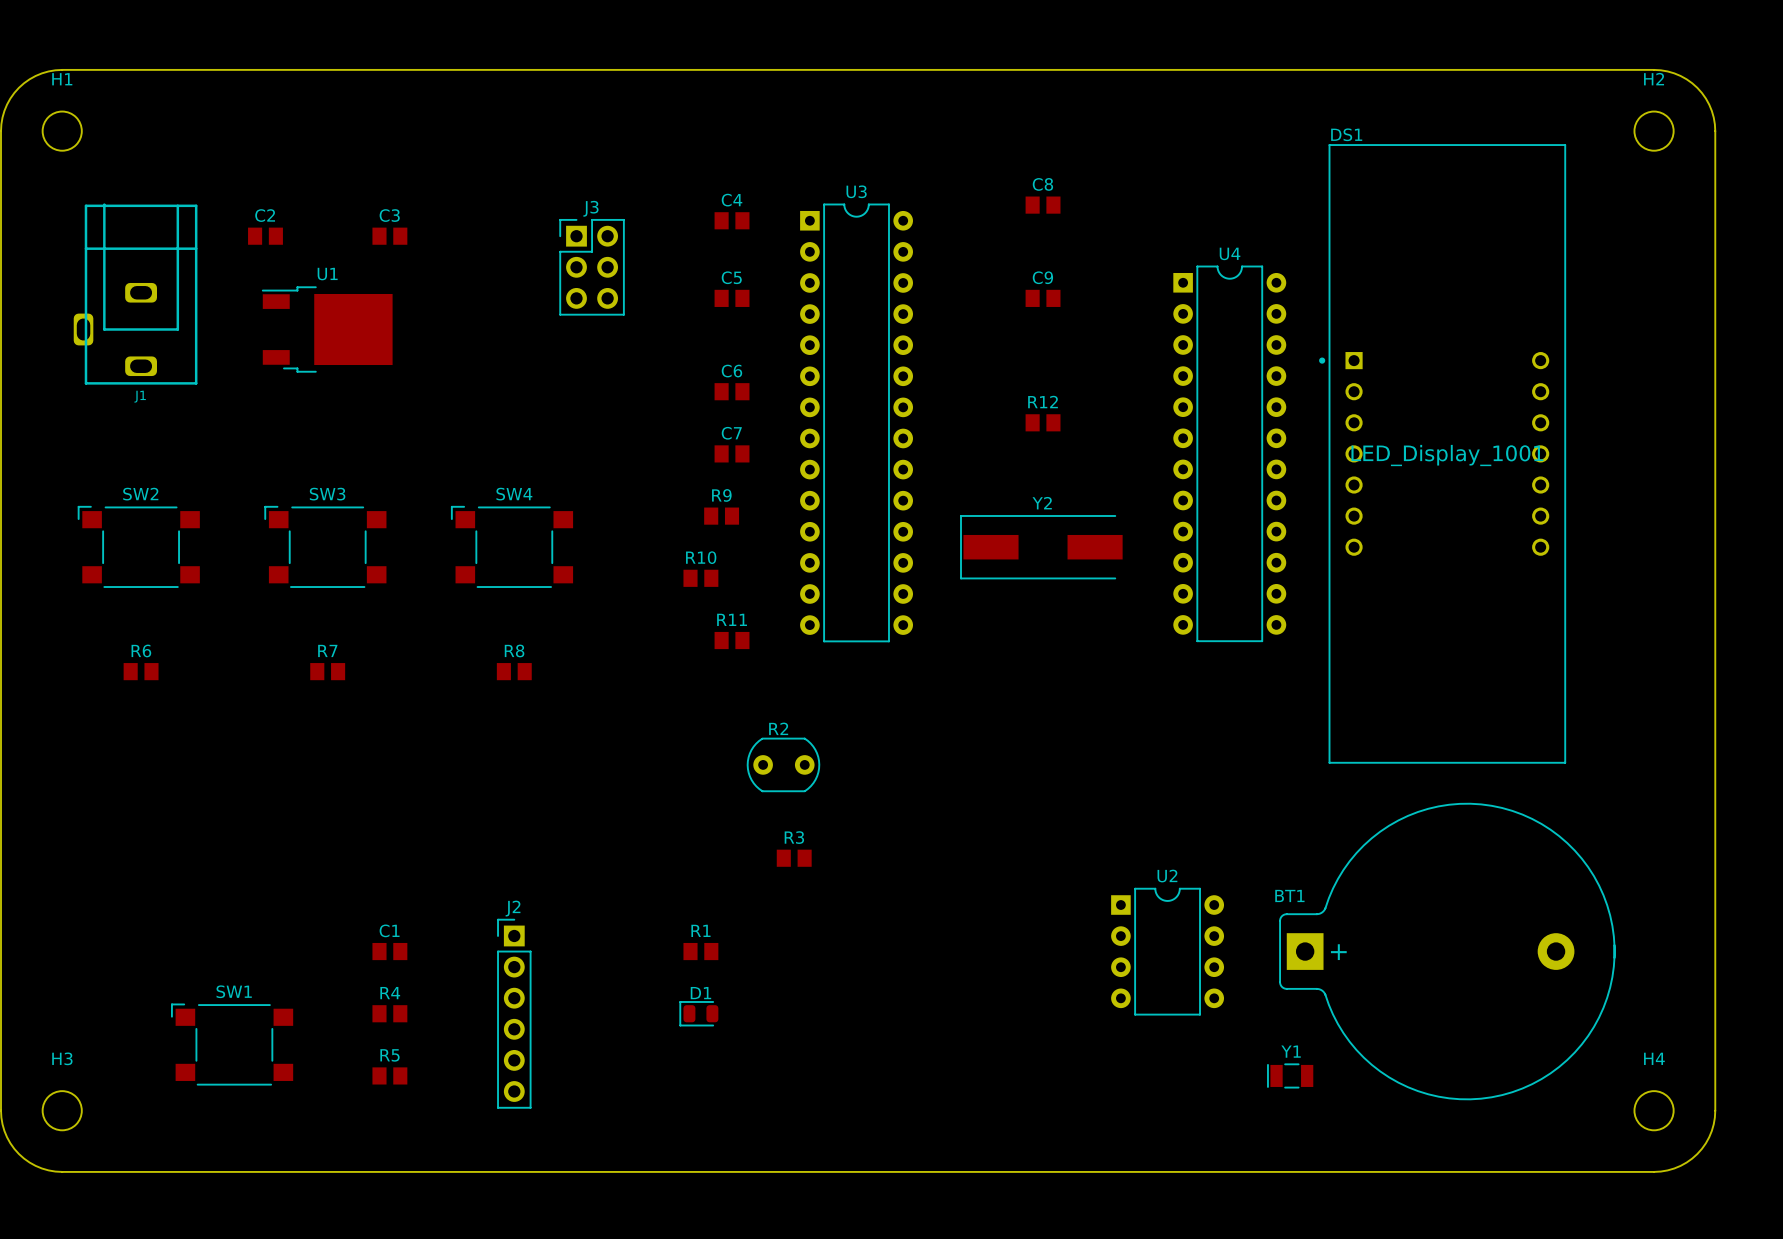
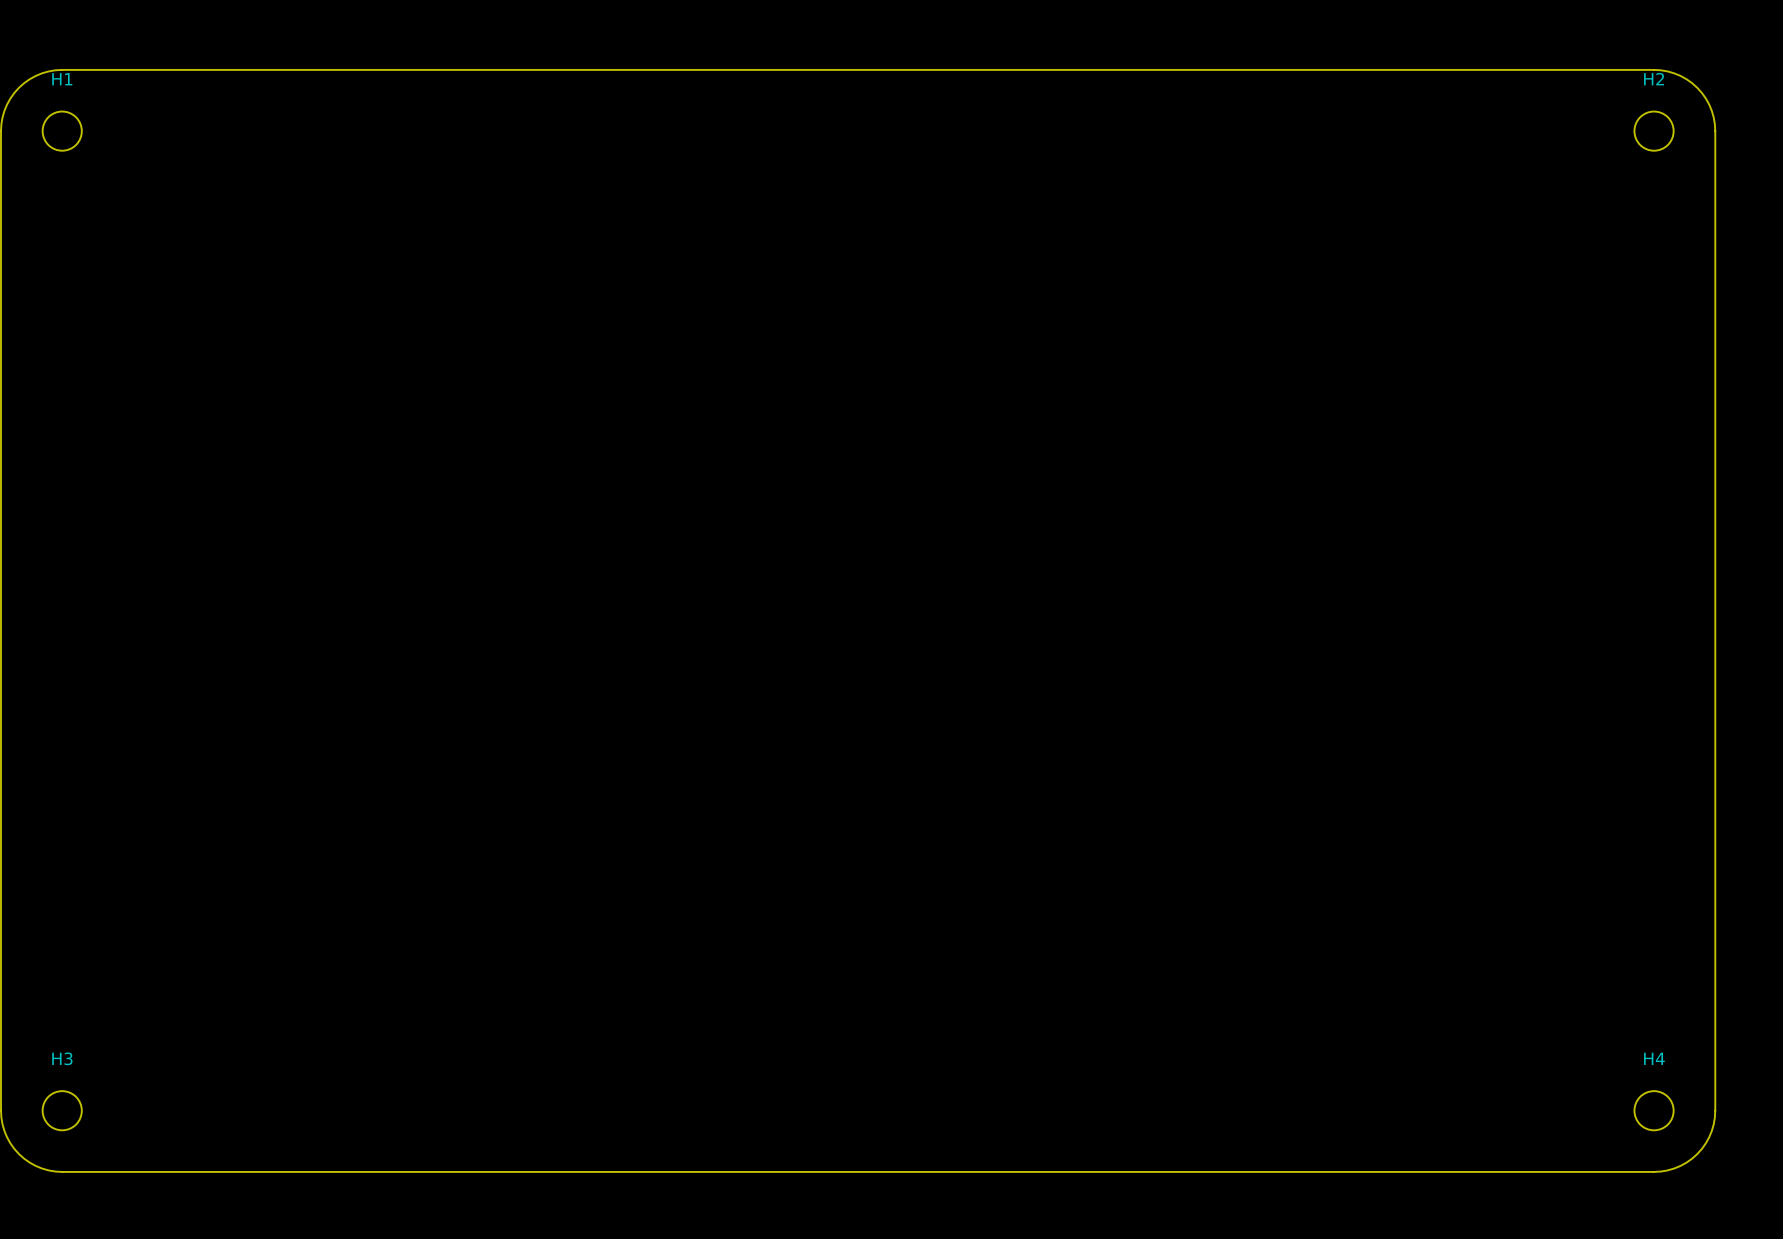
C8: (1043, 205) -> none
C4: (732, 220) -> none
C2: (265, 236) -> none
C3: (389, 236) -> none
J3: (592, 267) -> none
J1: (135, 293) -> none
C5: (732, 298) -> none
C9: (1043, 298) -> none
U1: (327, 329) -> none
C6: (732, 391) -> none
U3: (856, 422) -> none
R12: (1043, 422) -> none
C7: (732, 453) -> none
U4: (1229, 453) -> none
DS1: LED_Display_1001 (1442, 453) -> none
R9: (721, 516) -> none
SW2: (138, 546) -> none
SW3: (325, 546) -> none
SW4: (512, 546) -> none
Y2: (1041, 547) -> none
R10: (700, 578) -> none
R11: (732, 640) -> none
R6: (141, 671) -> none
R7: (327, 671) -> none
R8: (514, 671) -> none
R2: (783, 764) -> none
R3: (794, 858) -> none
C1: (389, 951) -> none
R1: (700, 951) -> none
U2: (1167, 951) -> none
BT1: (1447, 951) -> none
R4: (389, 1013) -> none
J2: (514, 1013) -> none
D1: (698, 1013) -> none
SW1: (232, 1044) -> none
R5: (389, 1075) -> none
Y1: (1290, 1075) -> none

